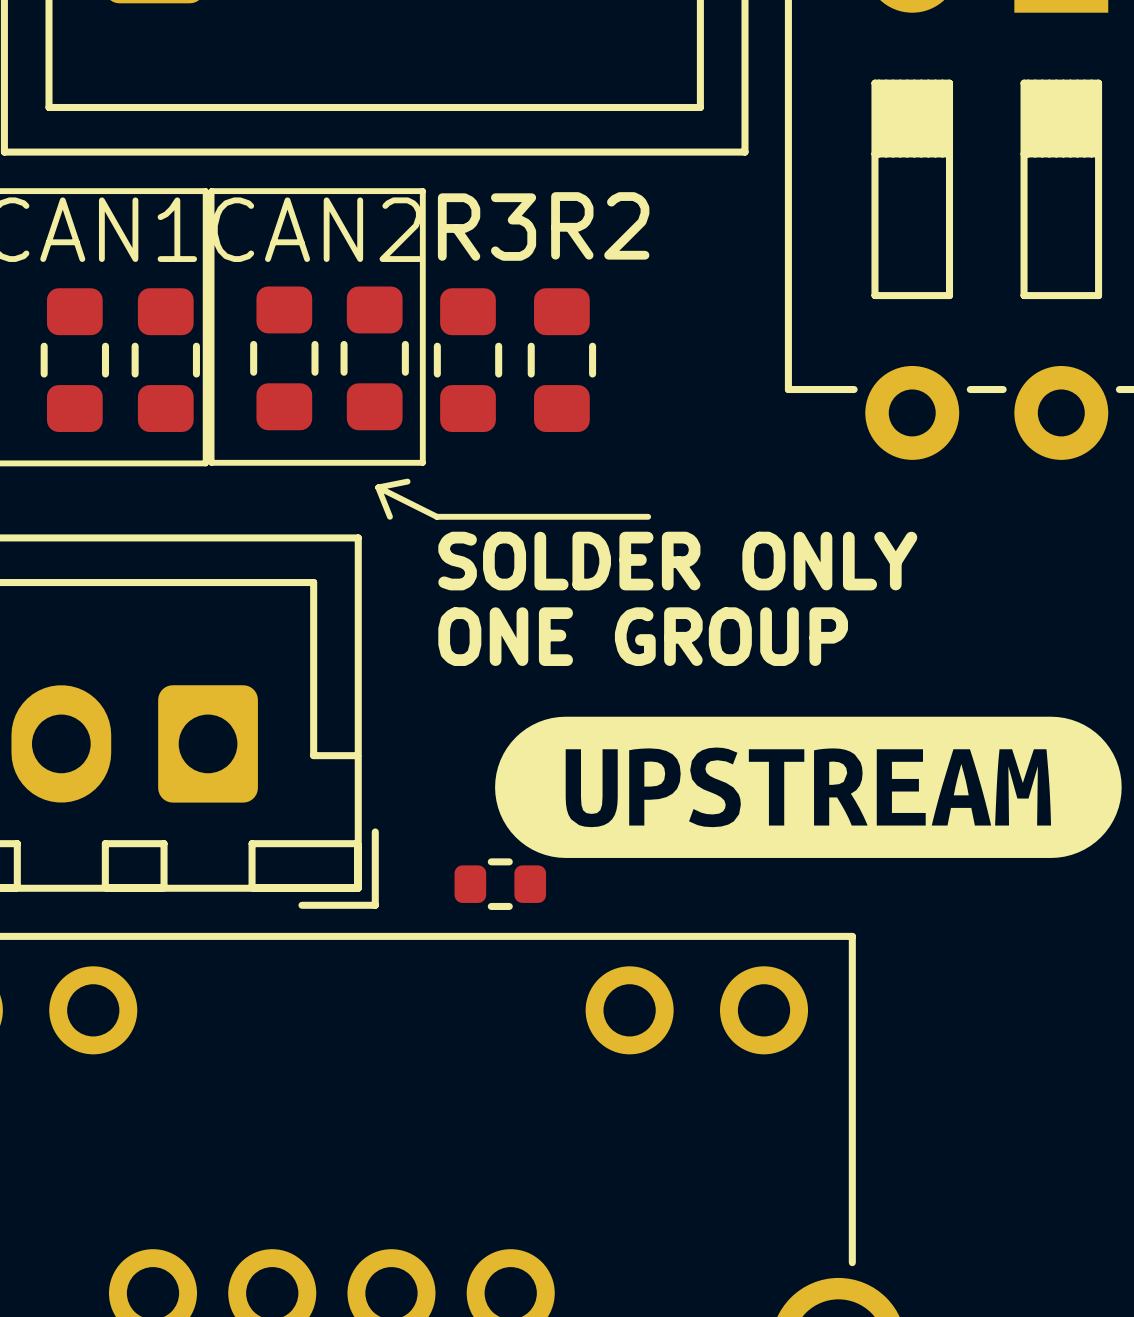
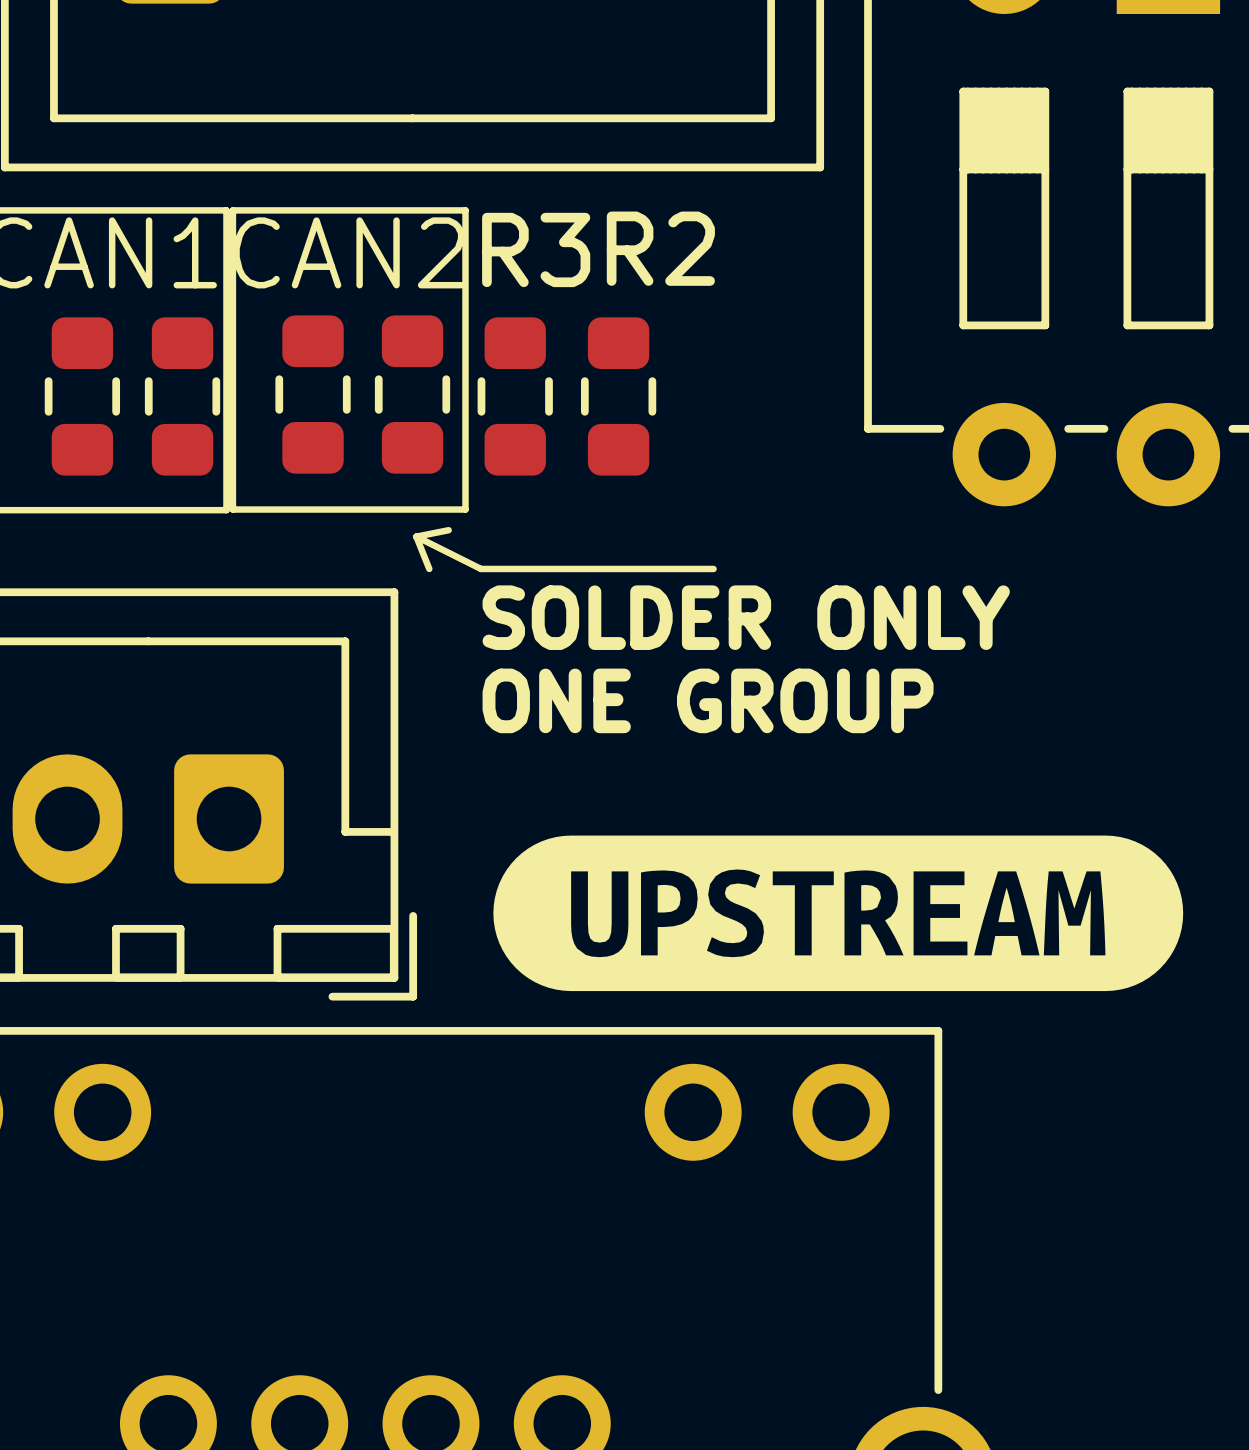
drawing position: (808, 787) -> (838, 913)
part: (500, 884) -> none

